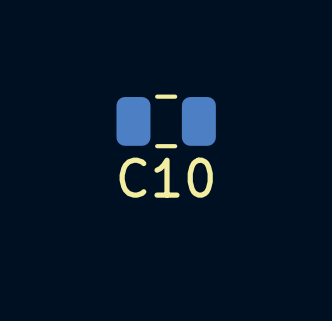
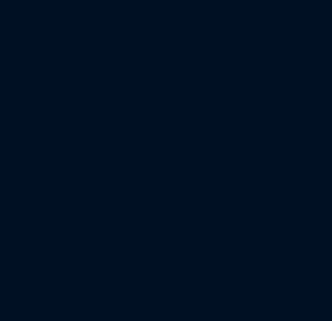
C10: (166, 121) -> none

